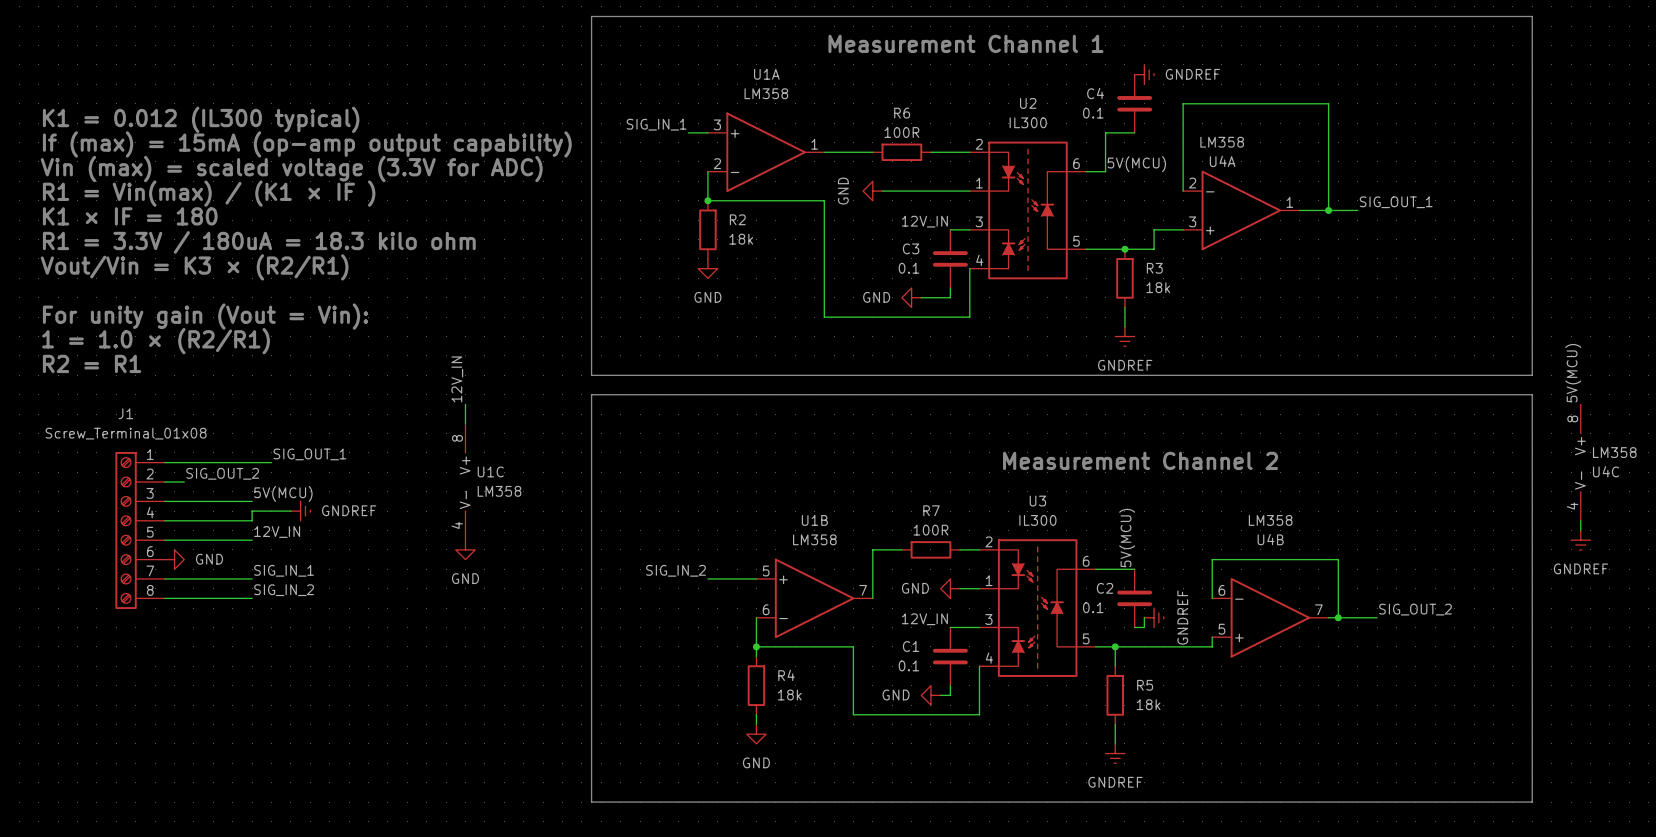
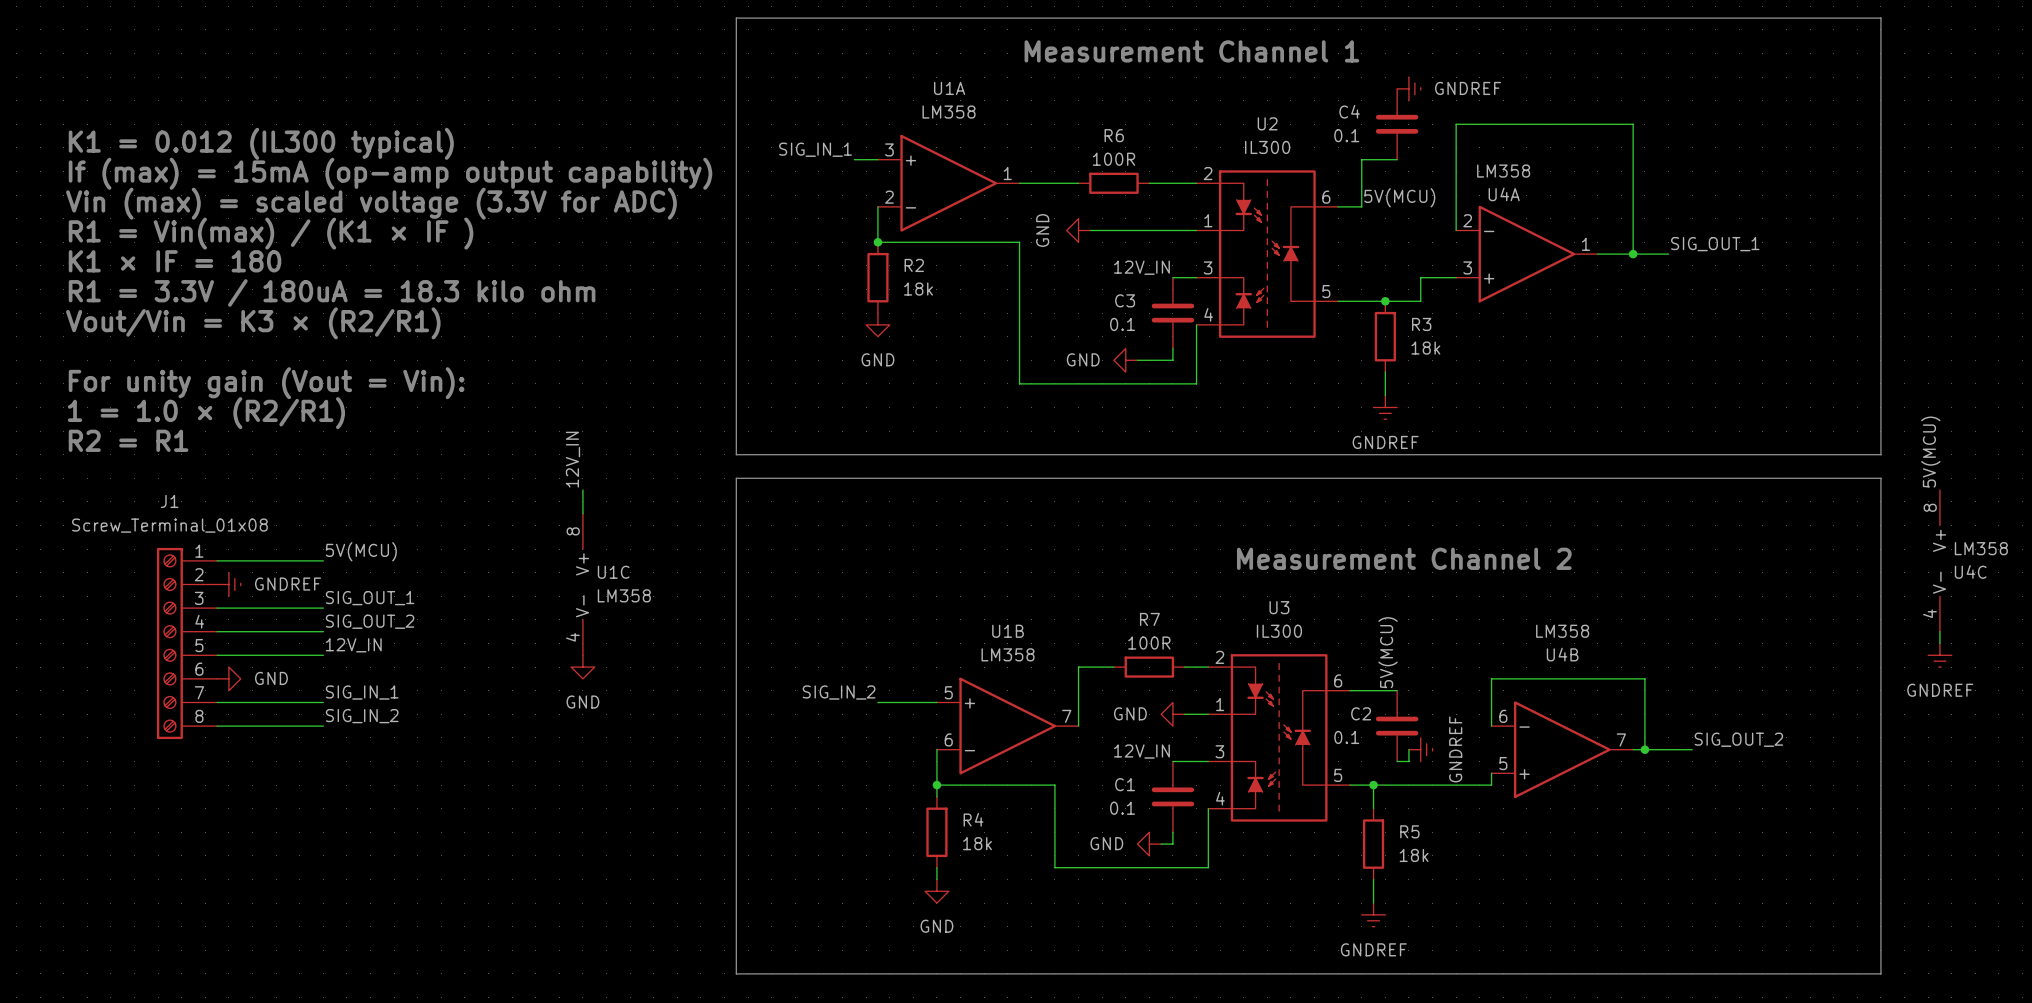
label: SIG_OUT_1 (309, 454) -> none
label: none -> 5V(MCU) (361, 551)
wire: (252, 462) (271, 462) -> none
label position: SIG_OUT_2 (222, 473) -> SIG_OUT_2 (370, 621)
label: 5V(MCU) (283, 493) -> SIG_OUT_1 (370, 598)
wire: (290, 511) (252, 511) (252, 520) -> none
power symbol position: GNDREF (300, 511) -> GNDREF (228, 584)

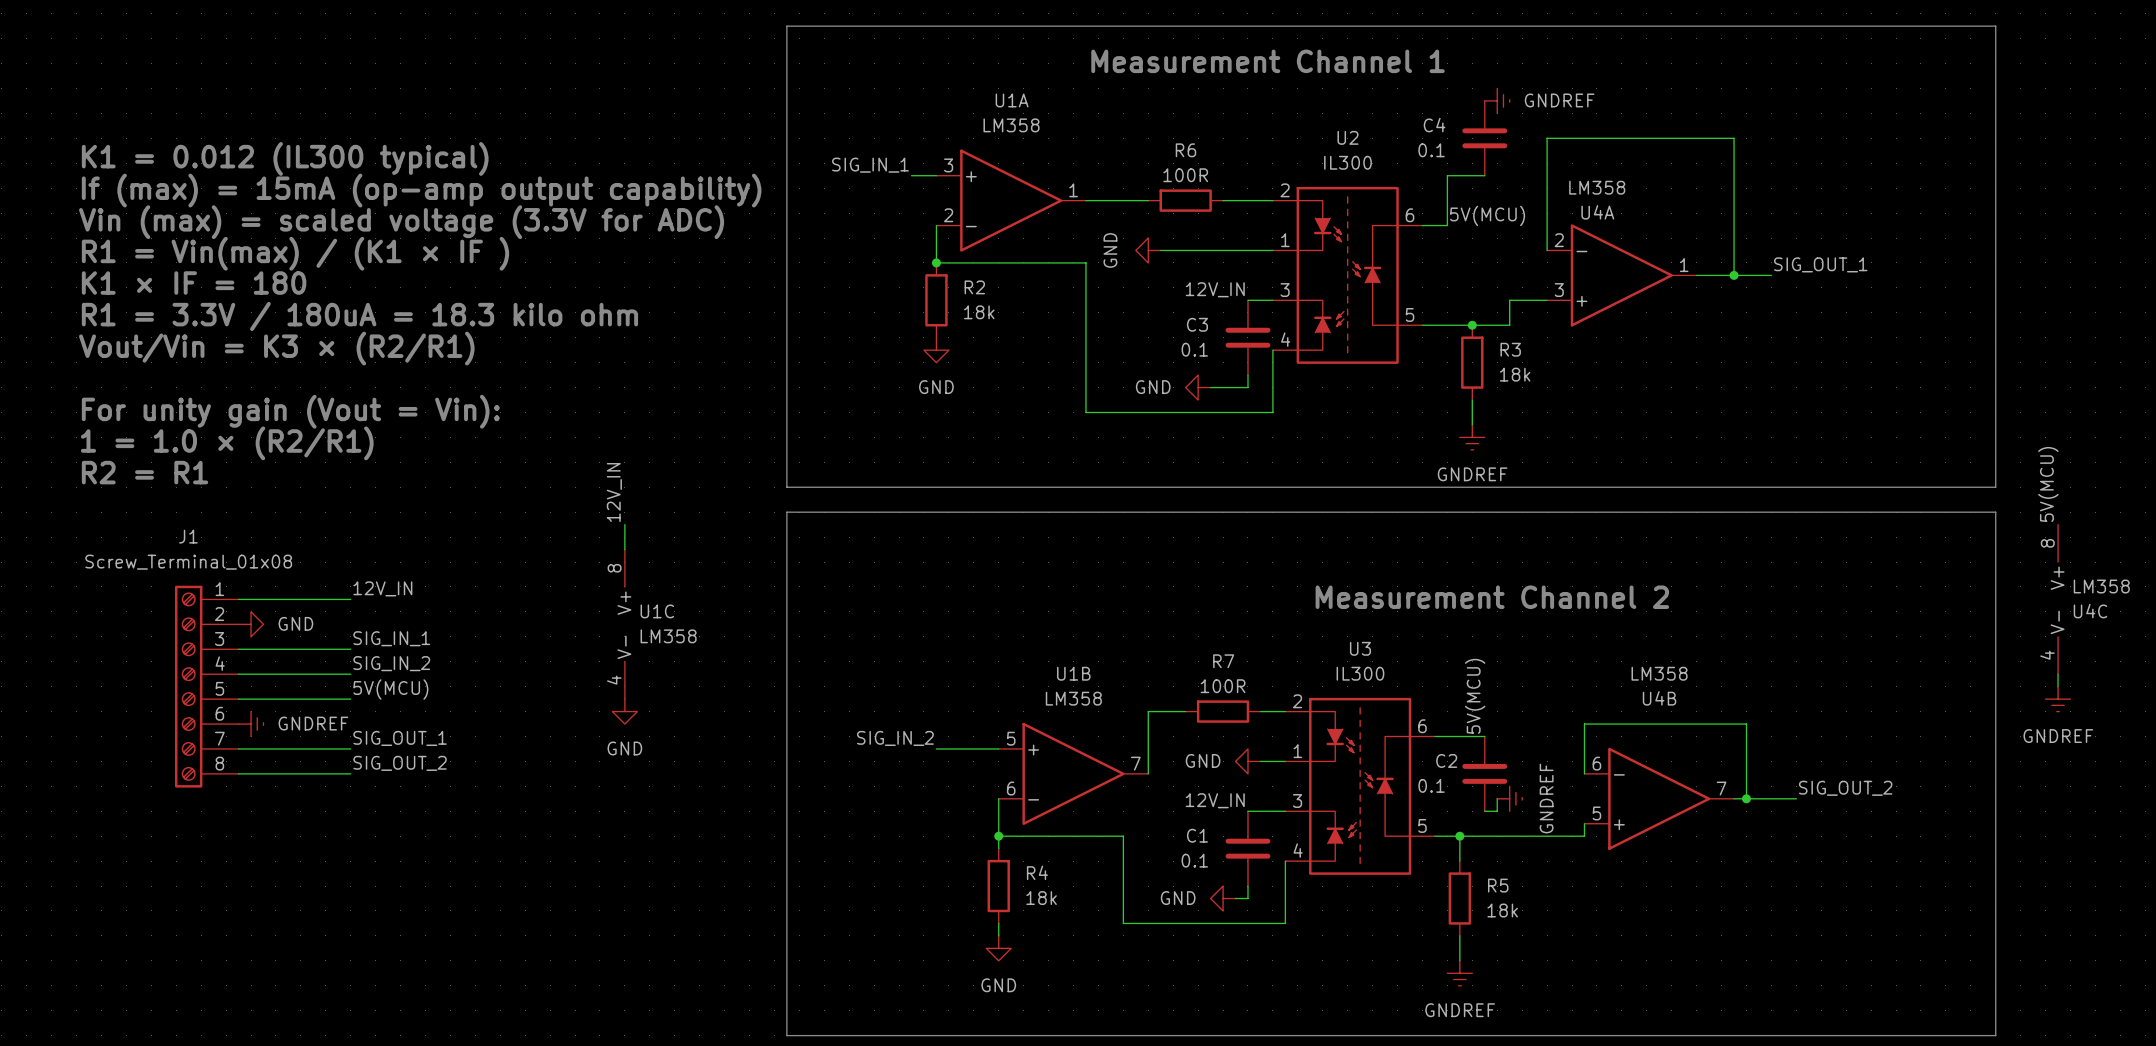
label: 5V(MCU) (361, 551) -> 12V_IN (382, 588)
power symbol: GNDREF (228, 584) -> GND (251, 624)
label: SIG_OUT_1 (370, 598) -> SIG_IN_1 (391, 638)
label: SIG_OUT_2 (370, 621) -> SIG_IN_2 (391, 663)
label: 12V_IN (353, 645) -> 5V(MCU) (390, 689)
power symbol: GND (228, 678) -> GNDREF (251, 724)
label: SIG_IN_1 (362, 692) -> SIG_OUT_1 (400, 738)
label: SIG_IN_2 (362, 716) -> SIG_OUT_2 (400, 763)

